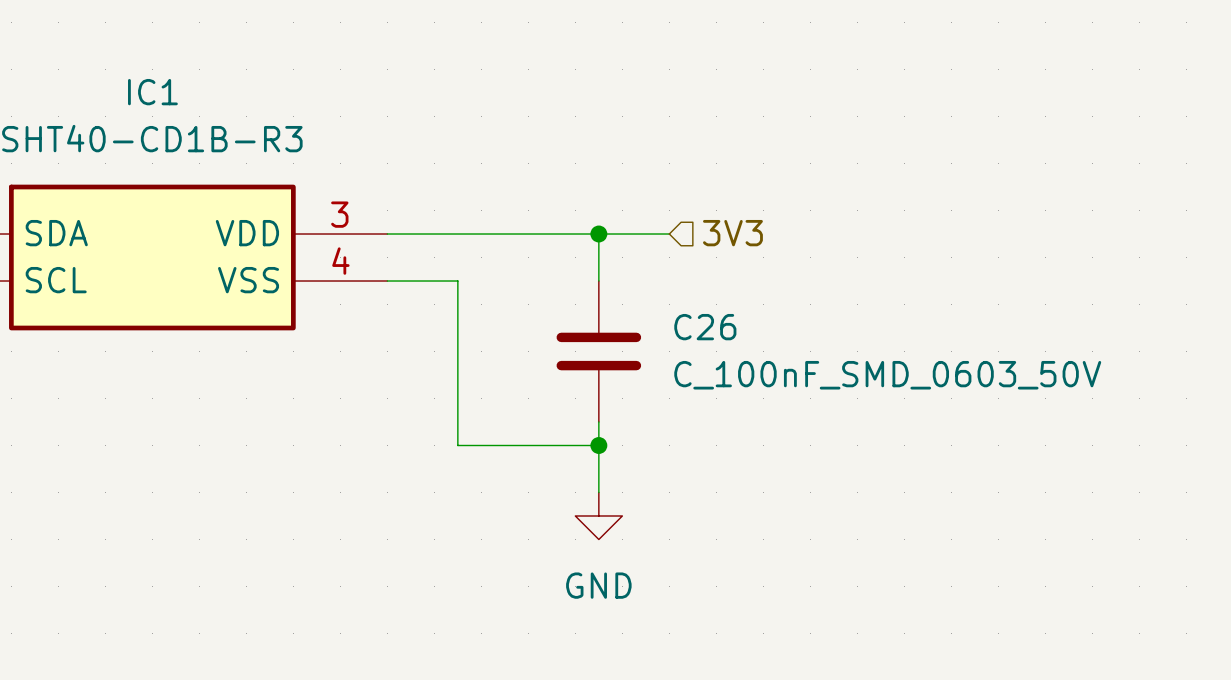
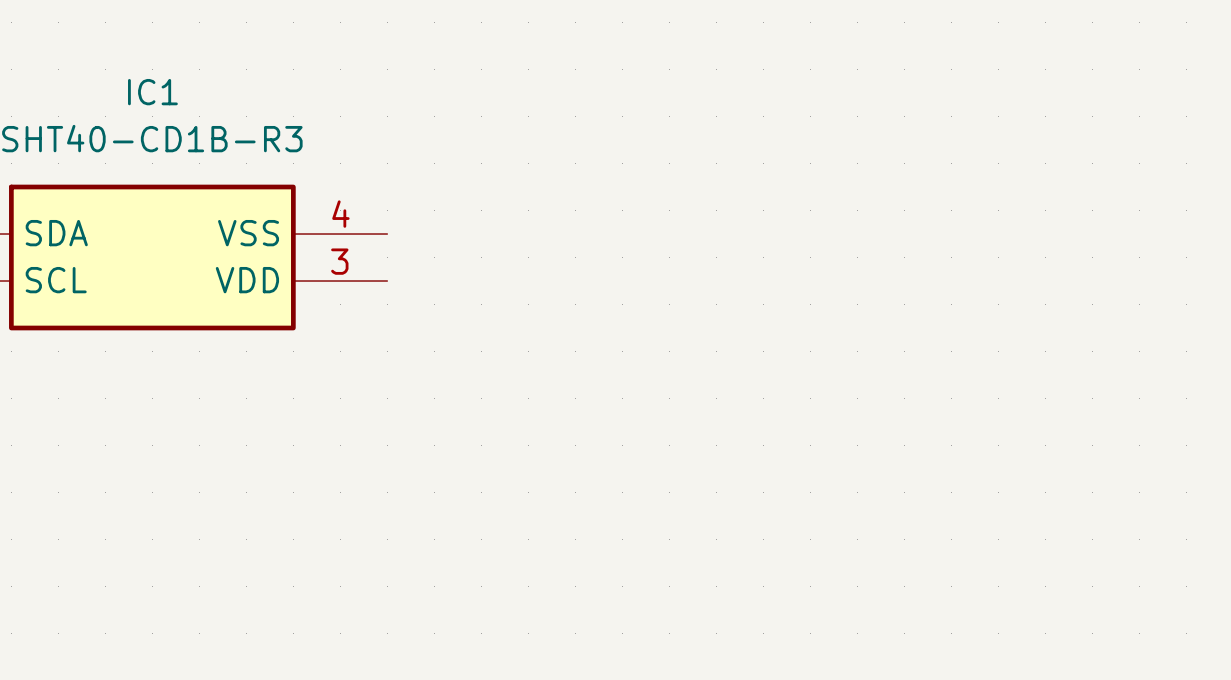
IC1 pin number: 3 (339, 214) -> 4 (340, 214)
IC1 pin name: VDD (247, 233) -> VSS (248, 233)
hierarchical label: 3V3 (732, 233) -> none
wire: (387, 234) (669, 234) -> none
wire: (598, 234) (598, 281) -> none
junction: (598, 234) -> none
IC1 pin number: 4 (340, 261) -> 3 (339, 261)
IC1 pin name: VSS (248, 280) -> VDD (247, 280)
wire: (387, 281) (457, 281) (457, 445) (598, 445) -> none
C26: C_100nF_SMD_0603_50V (598, 351) -> none
wire: (598, 422) (598, 492) -> none
junction: (598, 445) -> none
power symbol: GND (598, 515) -> none

